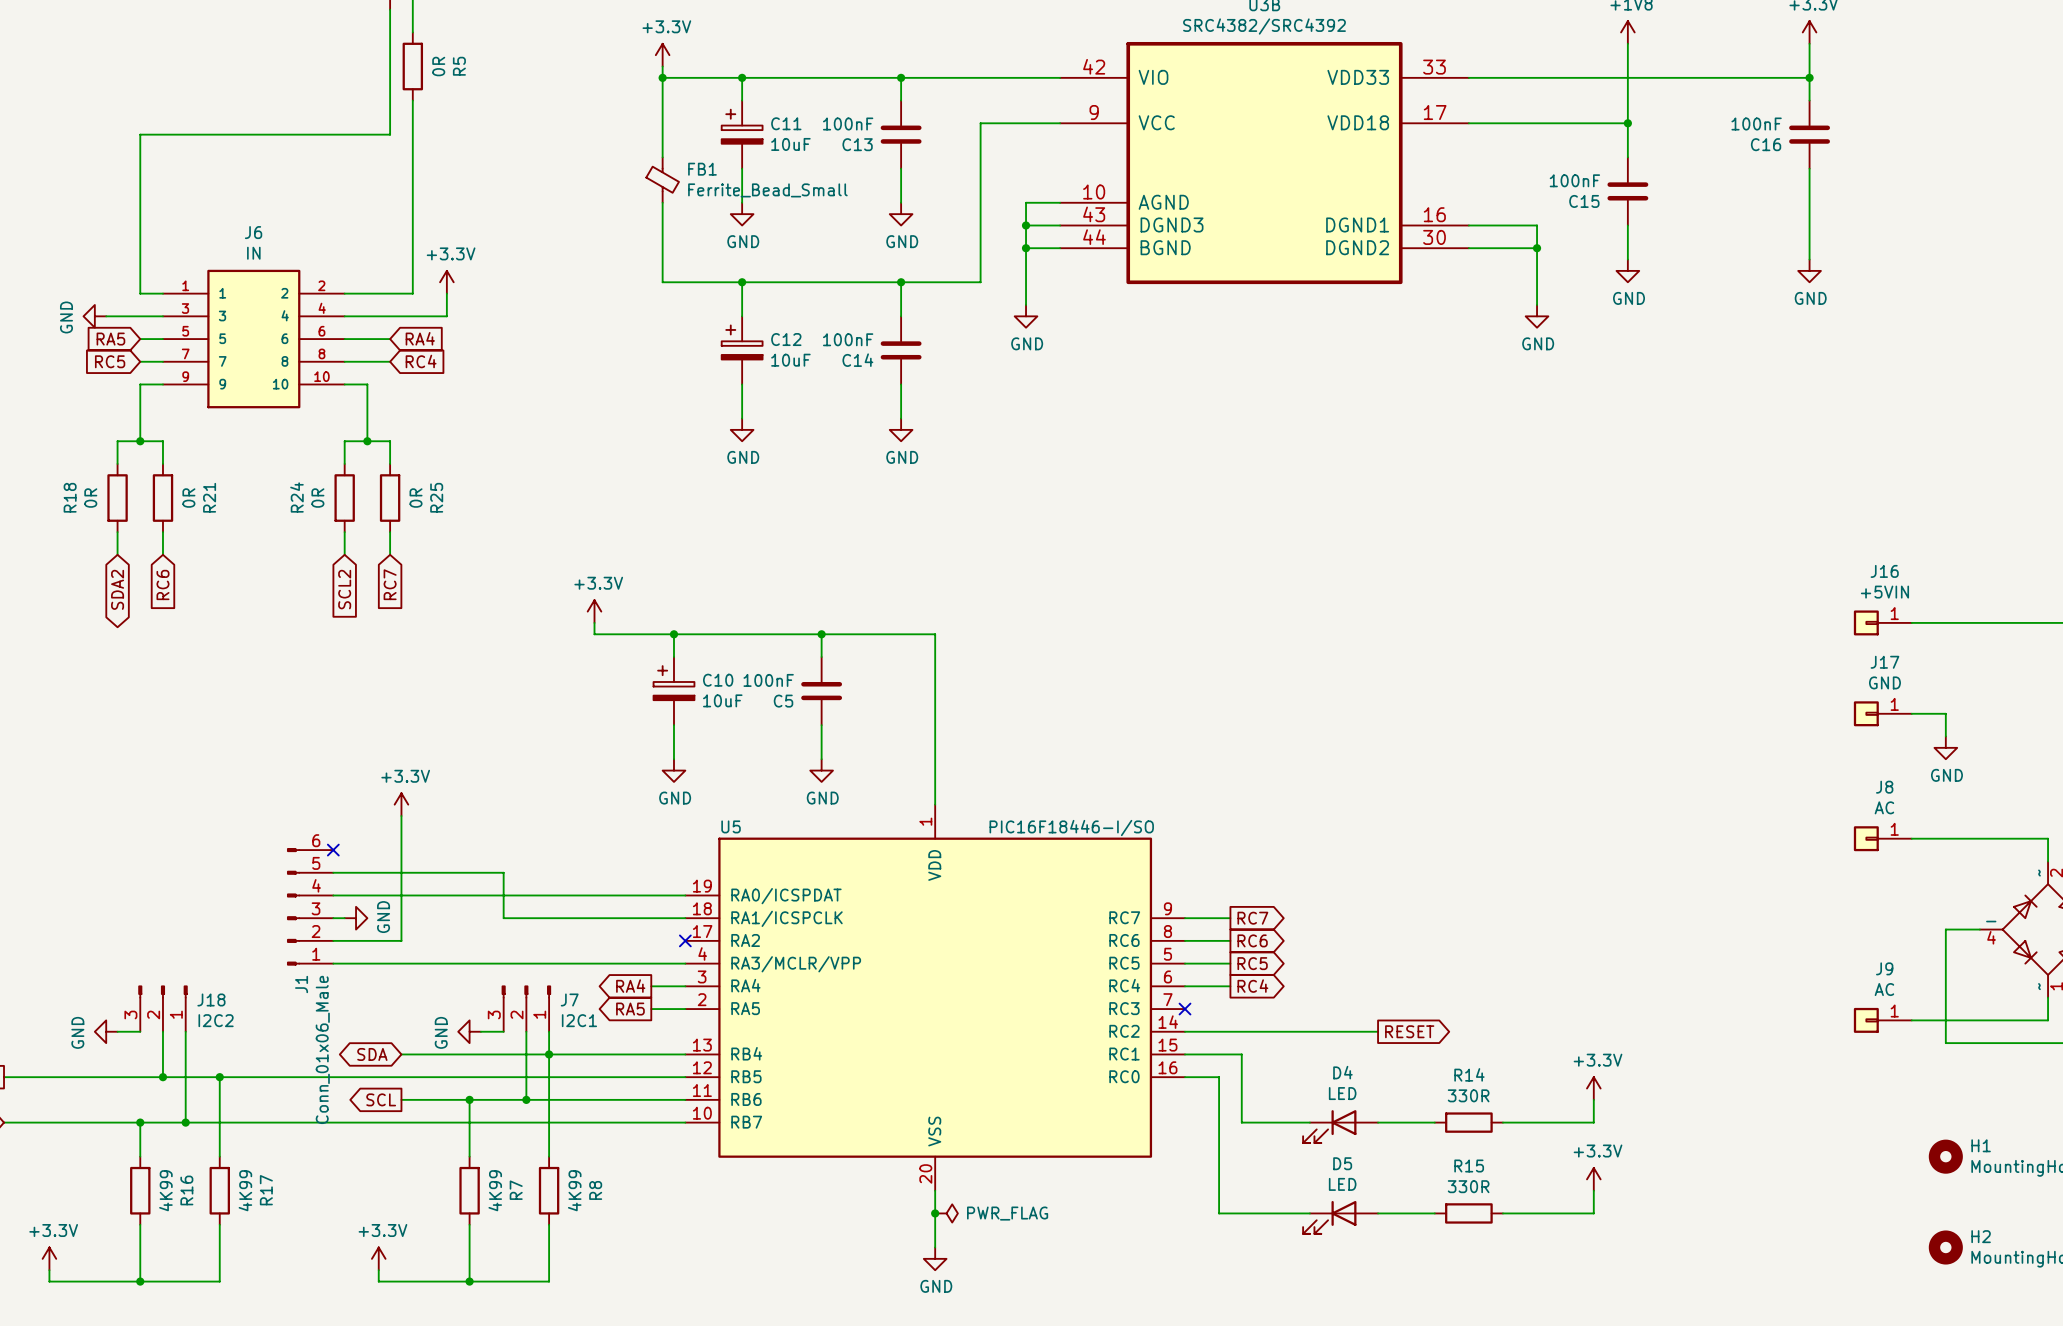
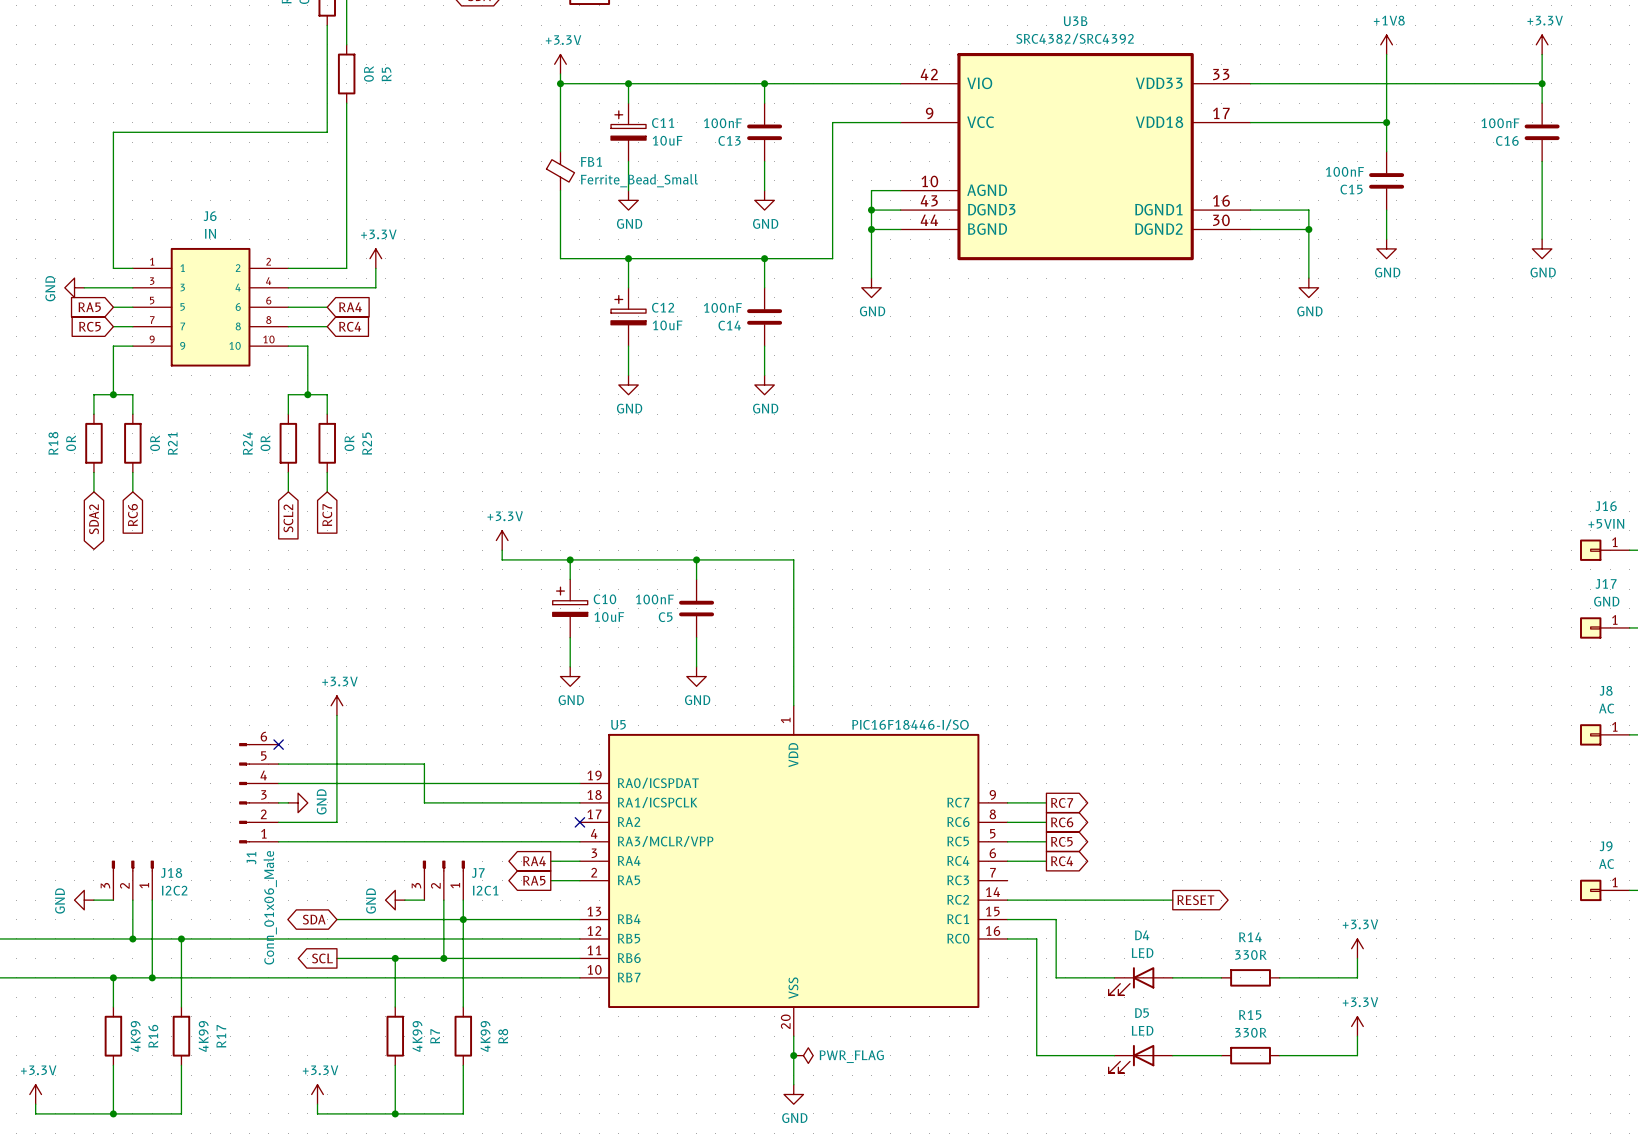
no-connect mark: (1185, 1009) -> none

